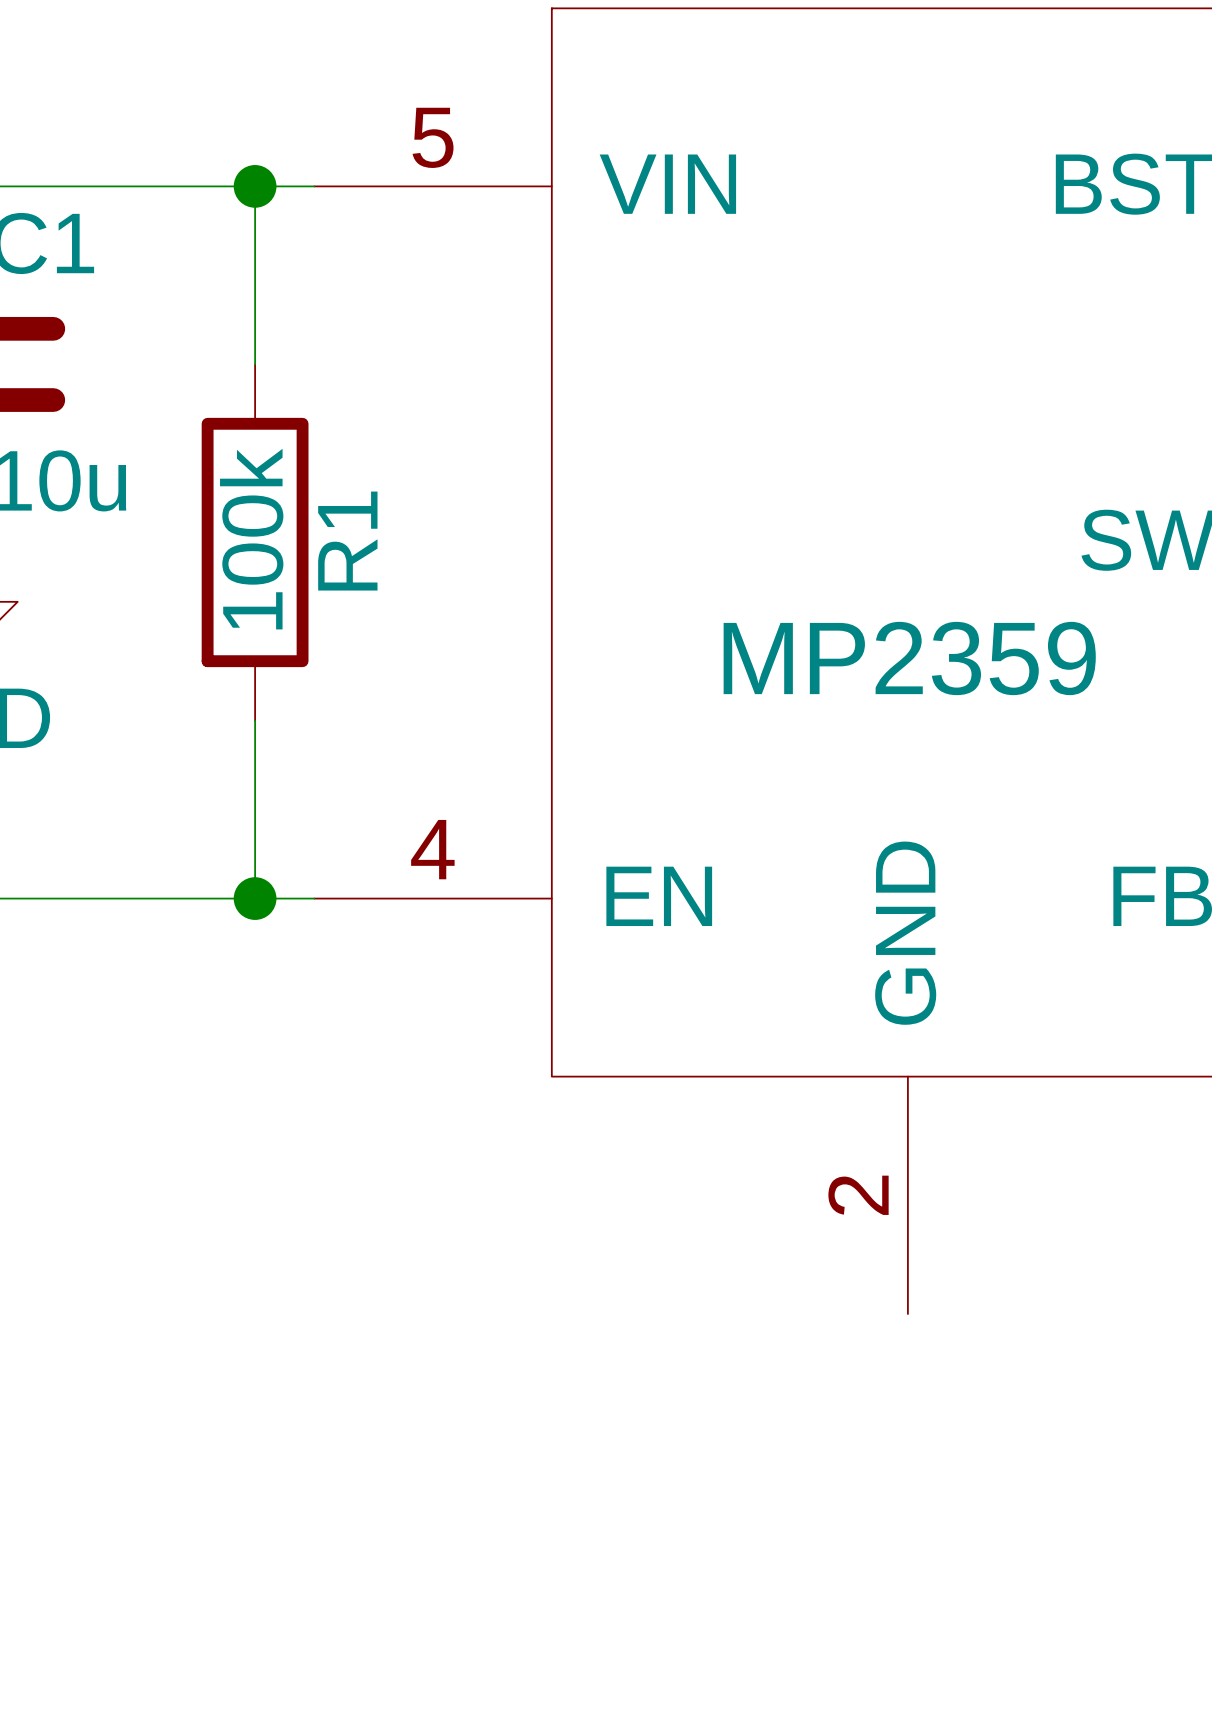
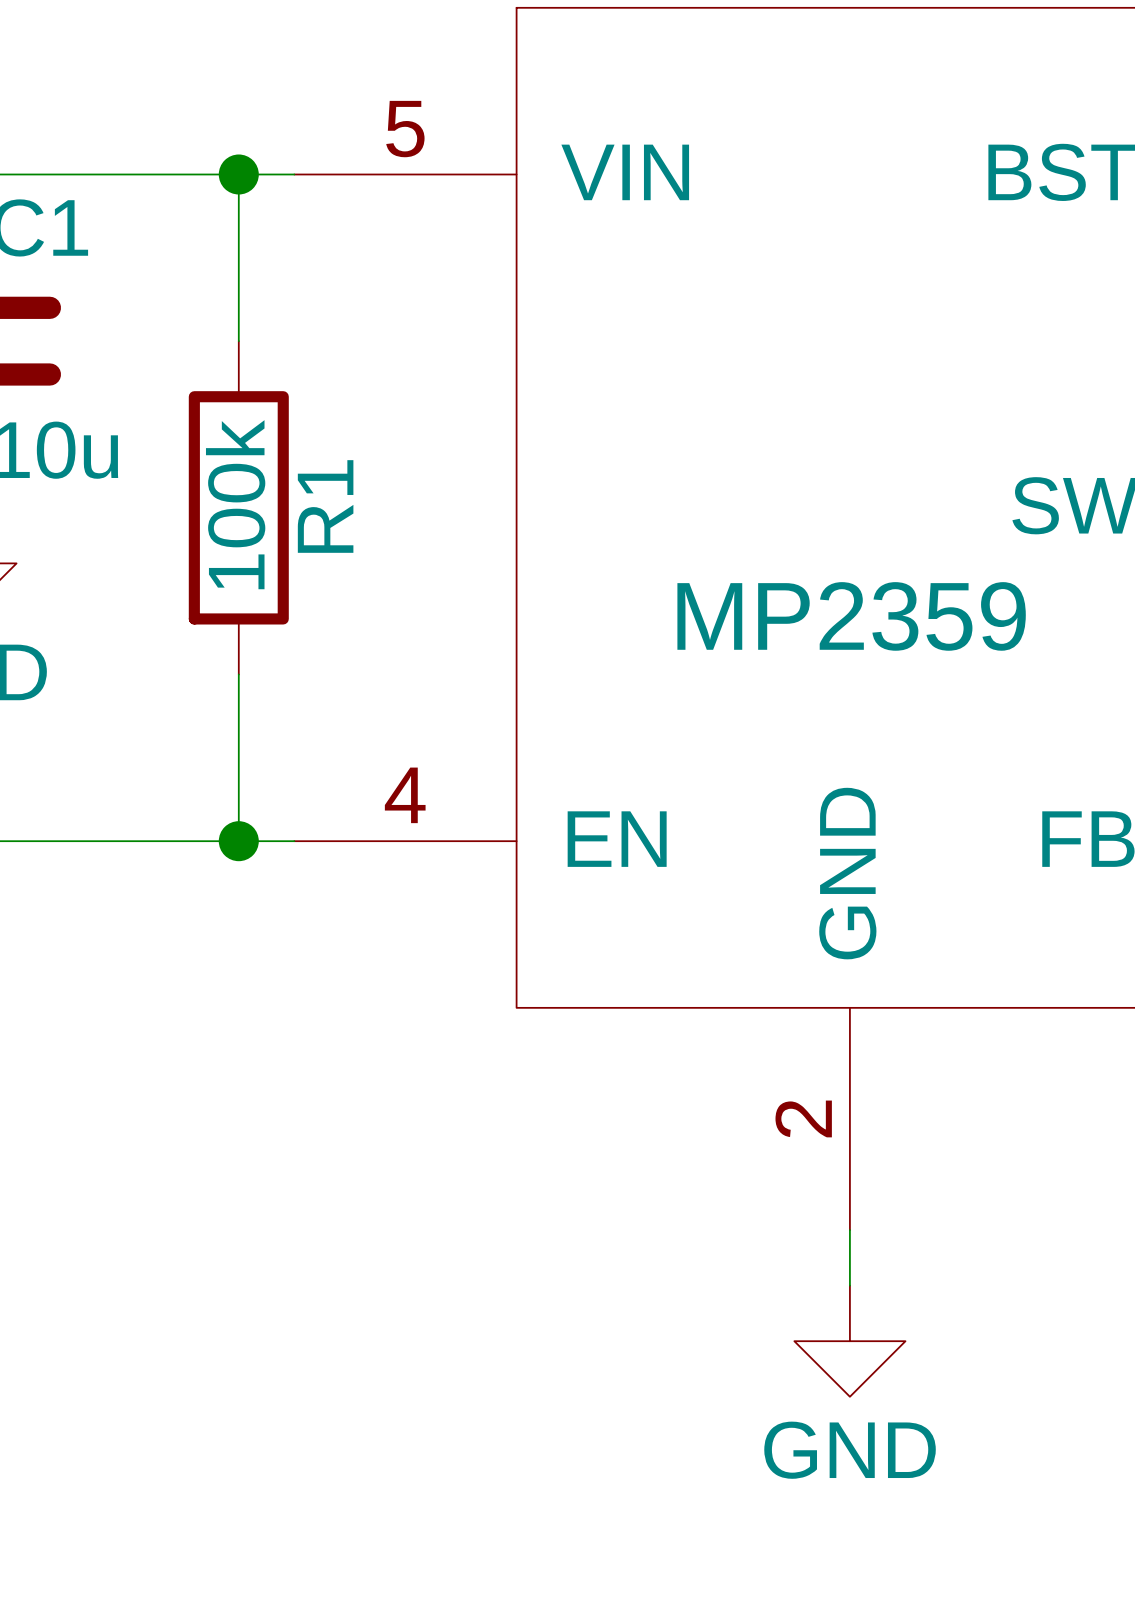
wire: none -> (849, 1230) (849, 1285)
power symbol: none -> GND (849, 1341)

